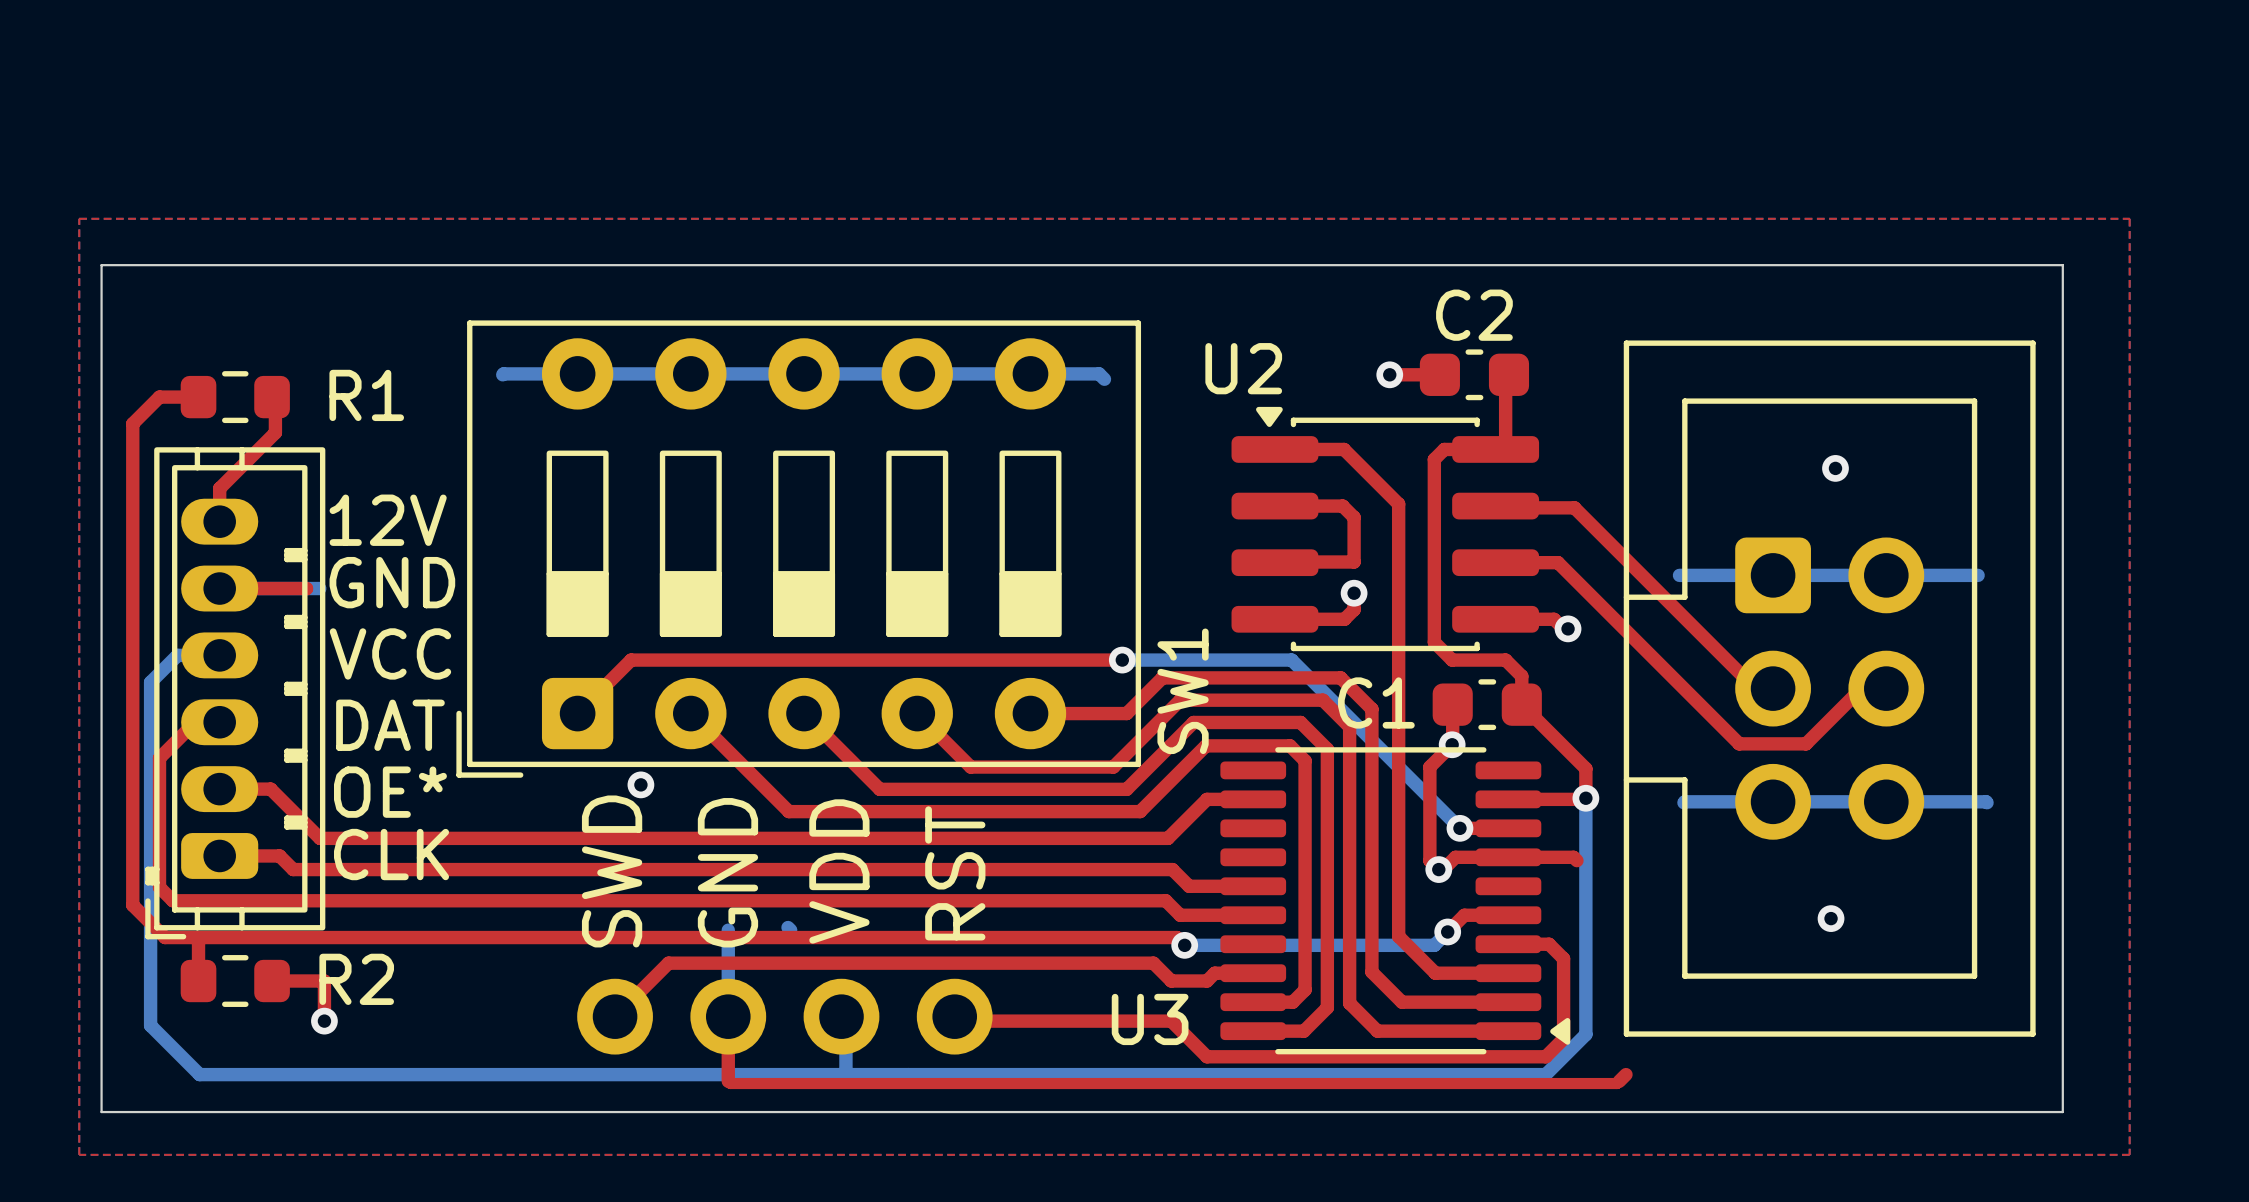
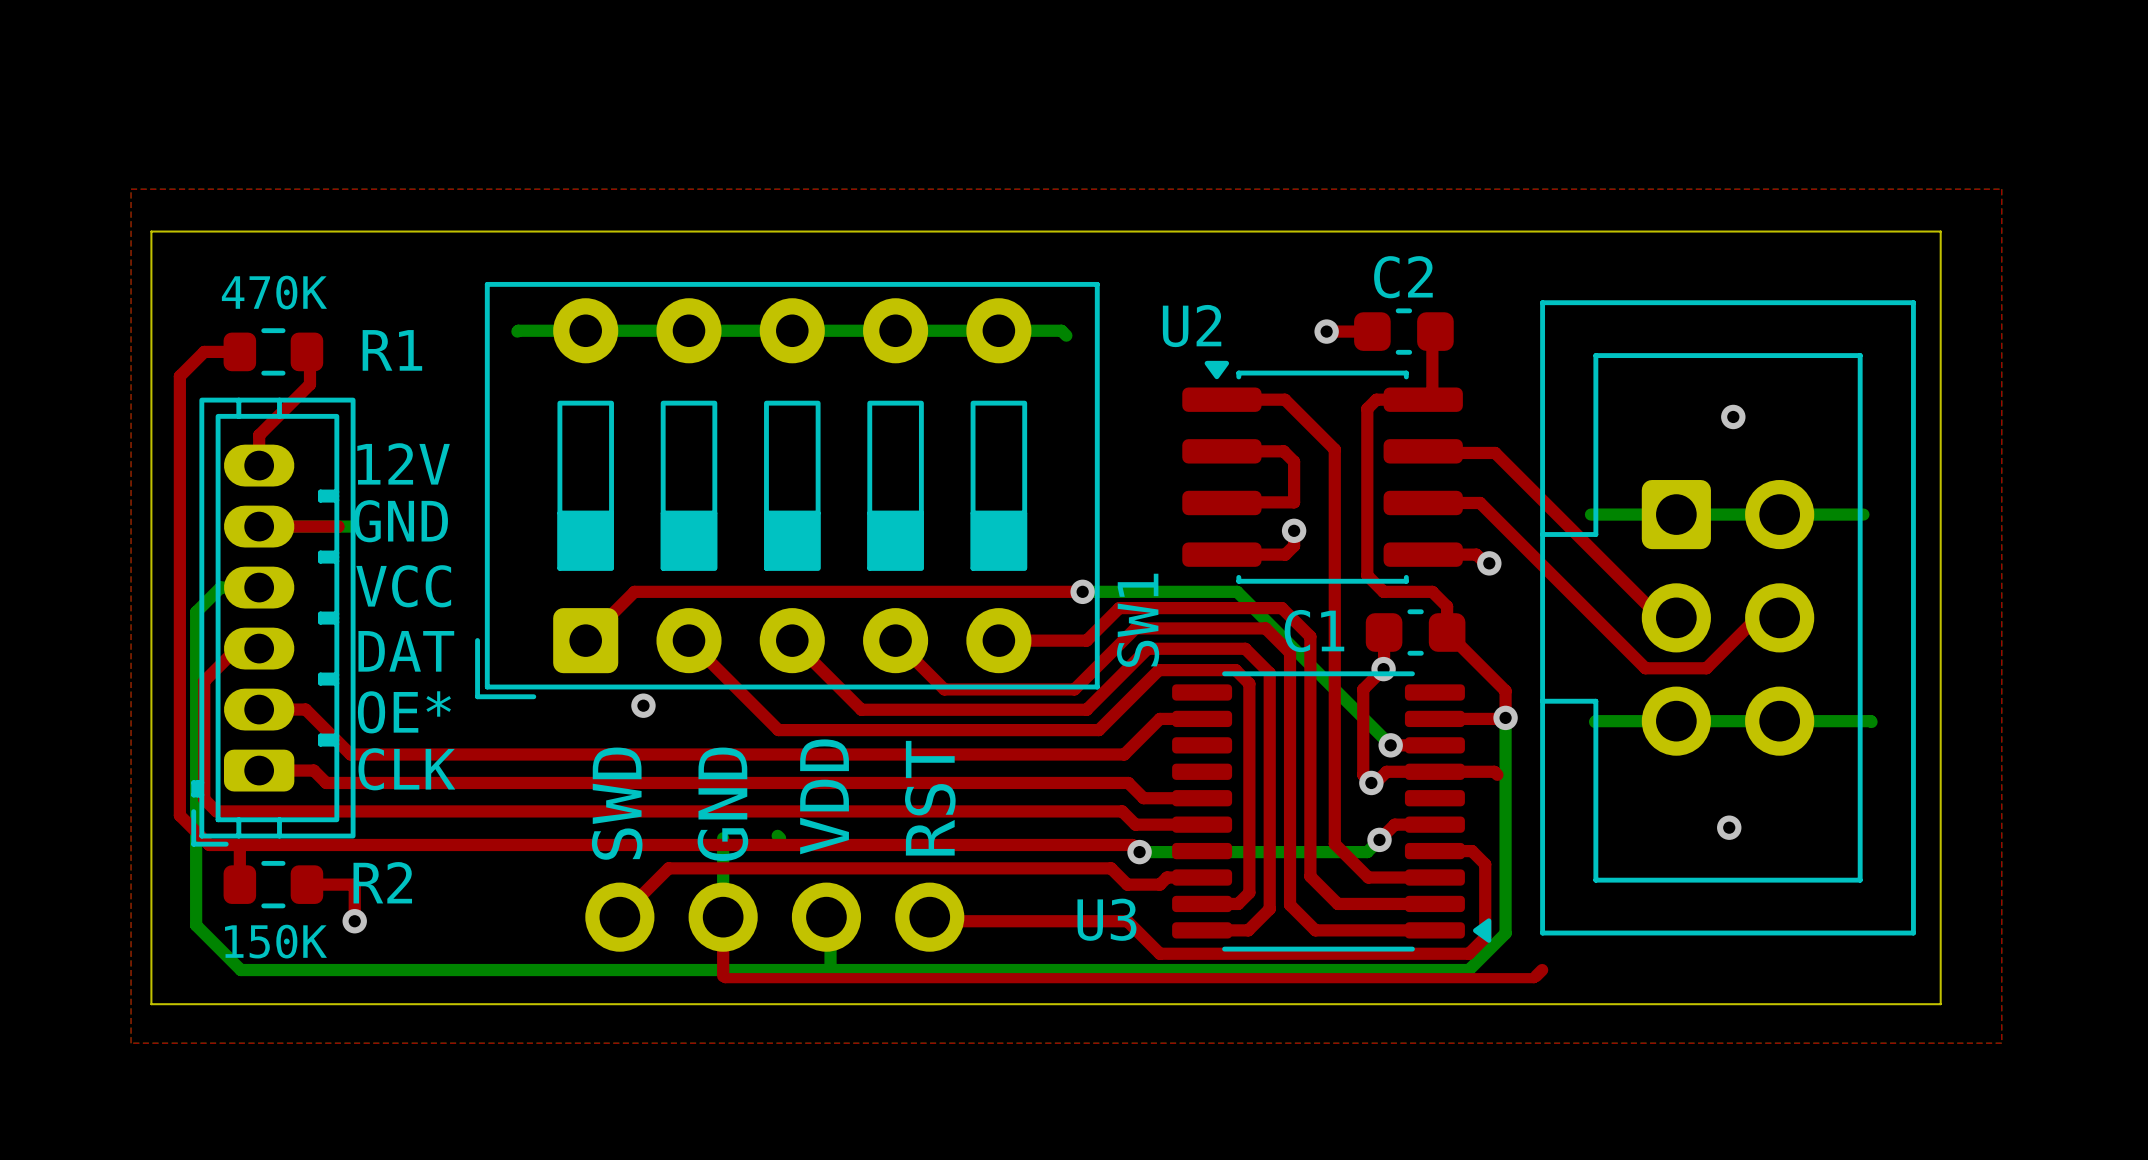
R1 value: none -> 470K (274, 292)
R2 value: none -> 150K (275, 941)

